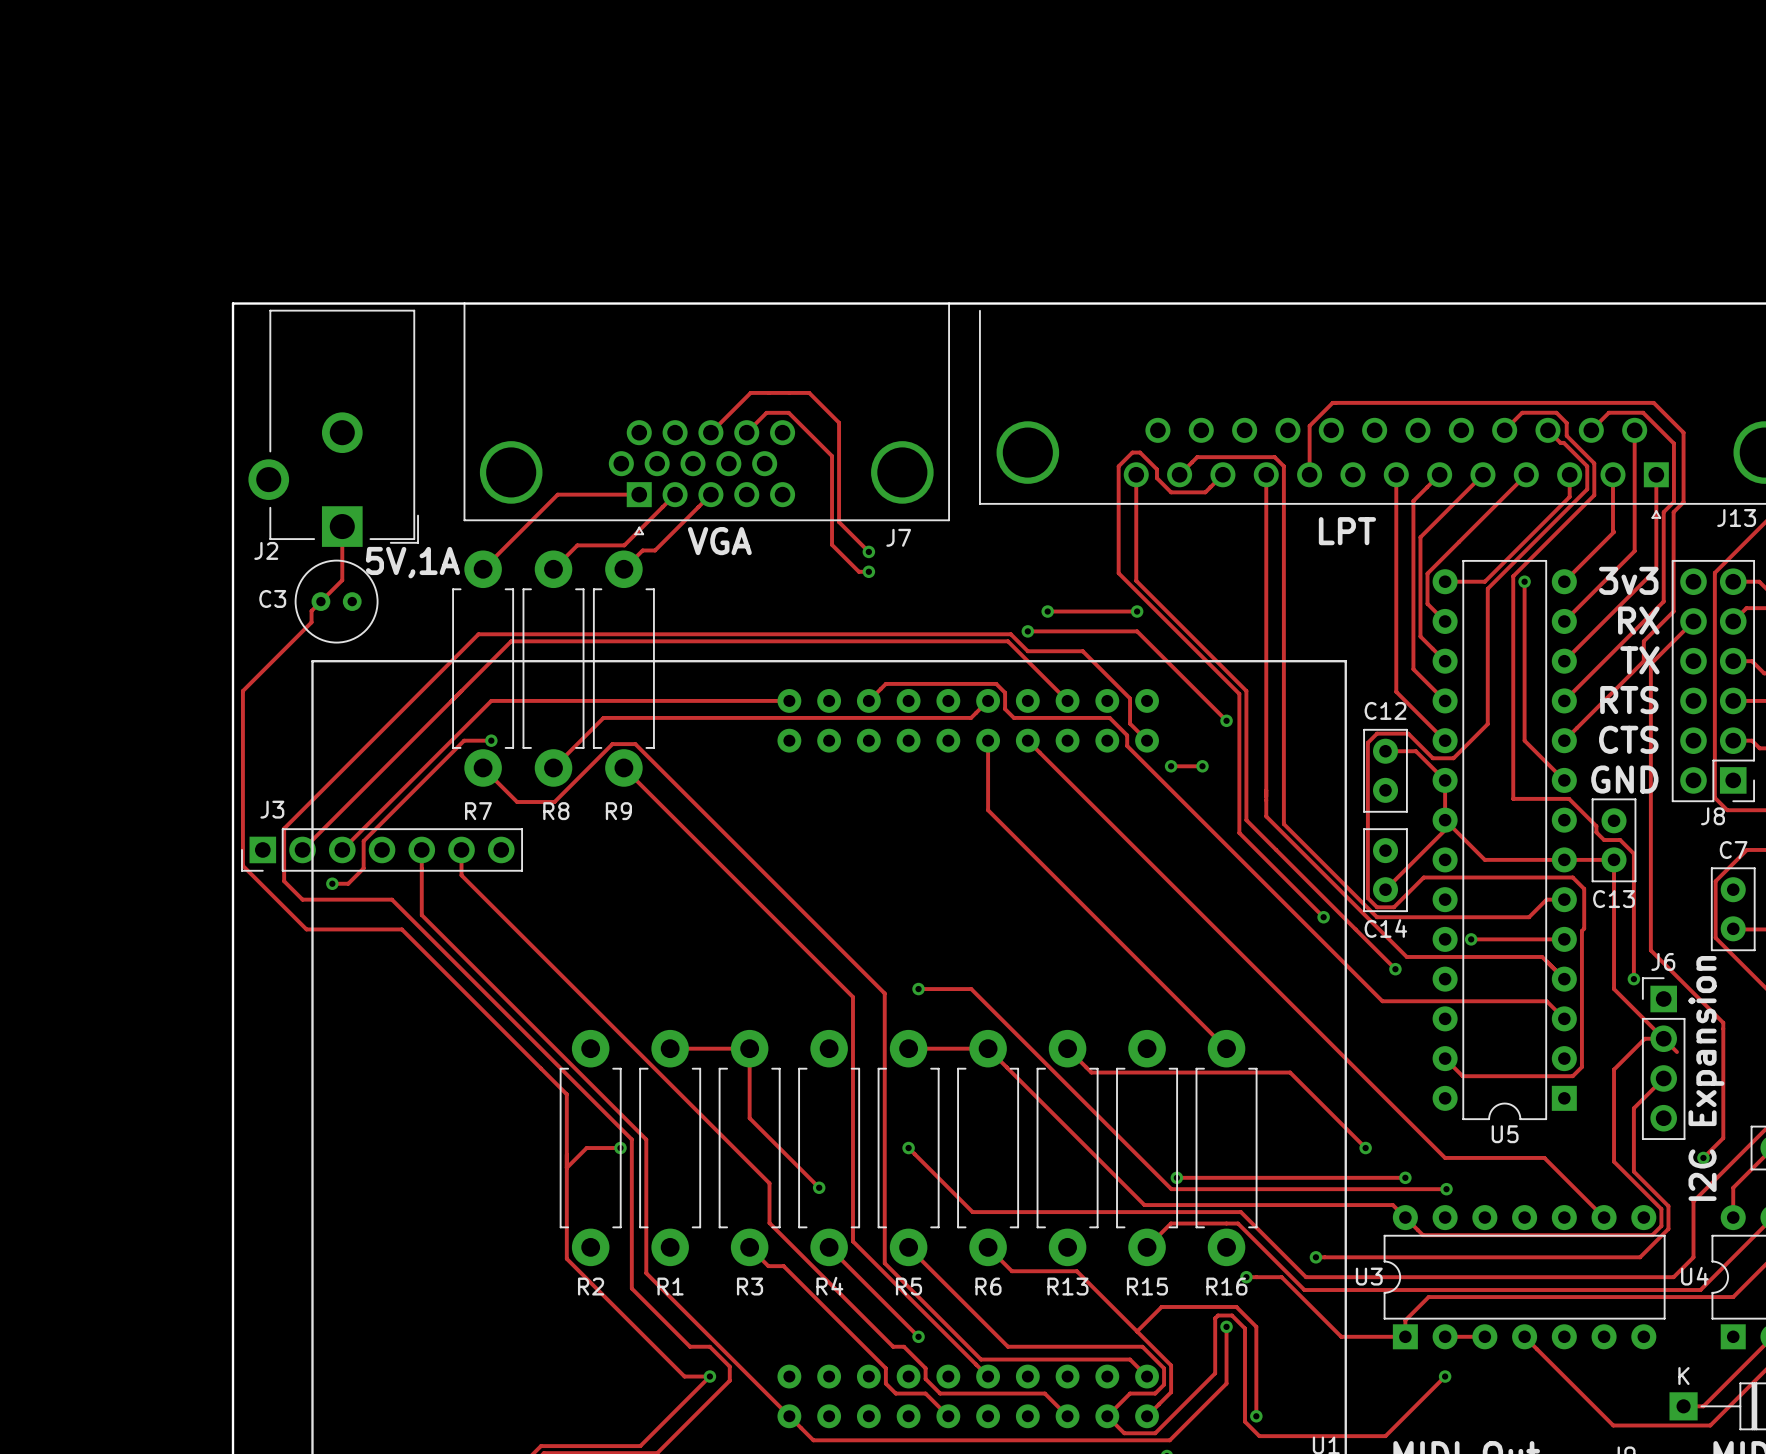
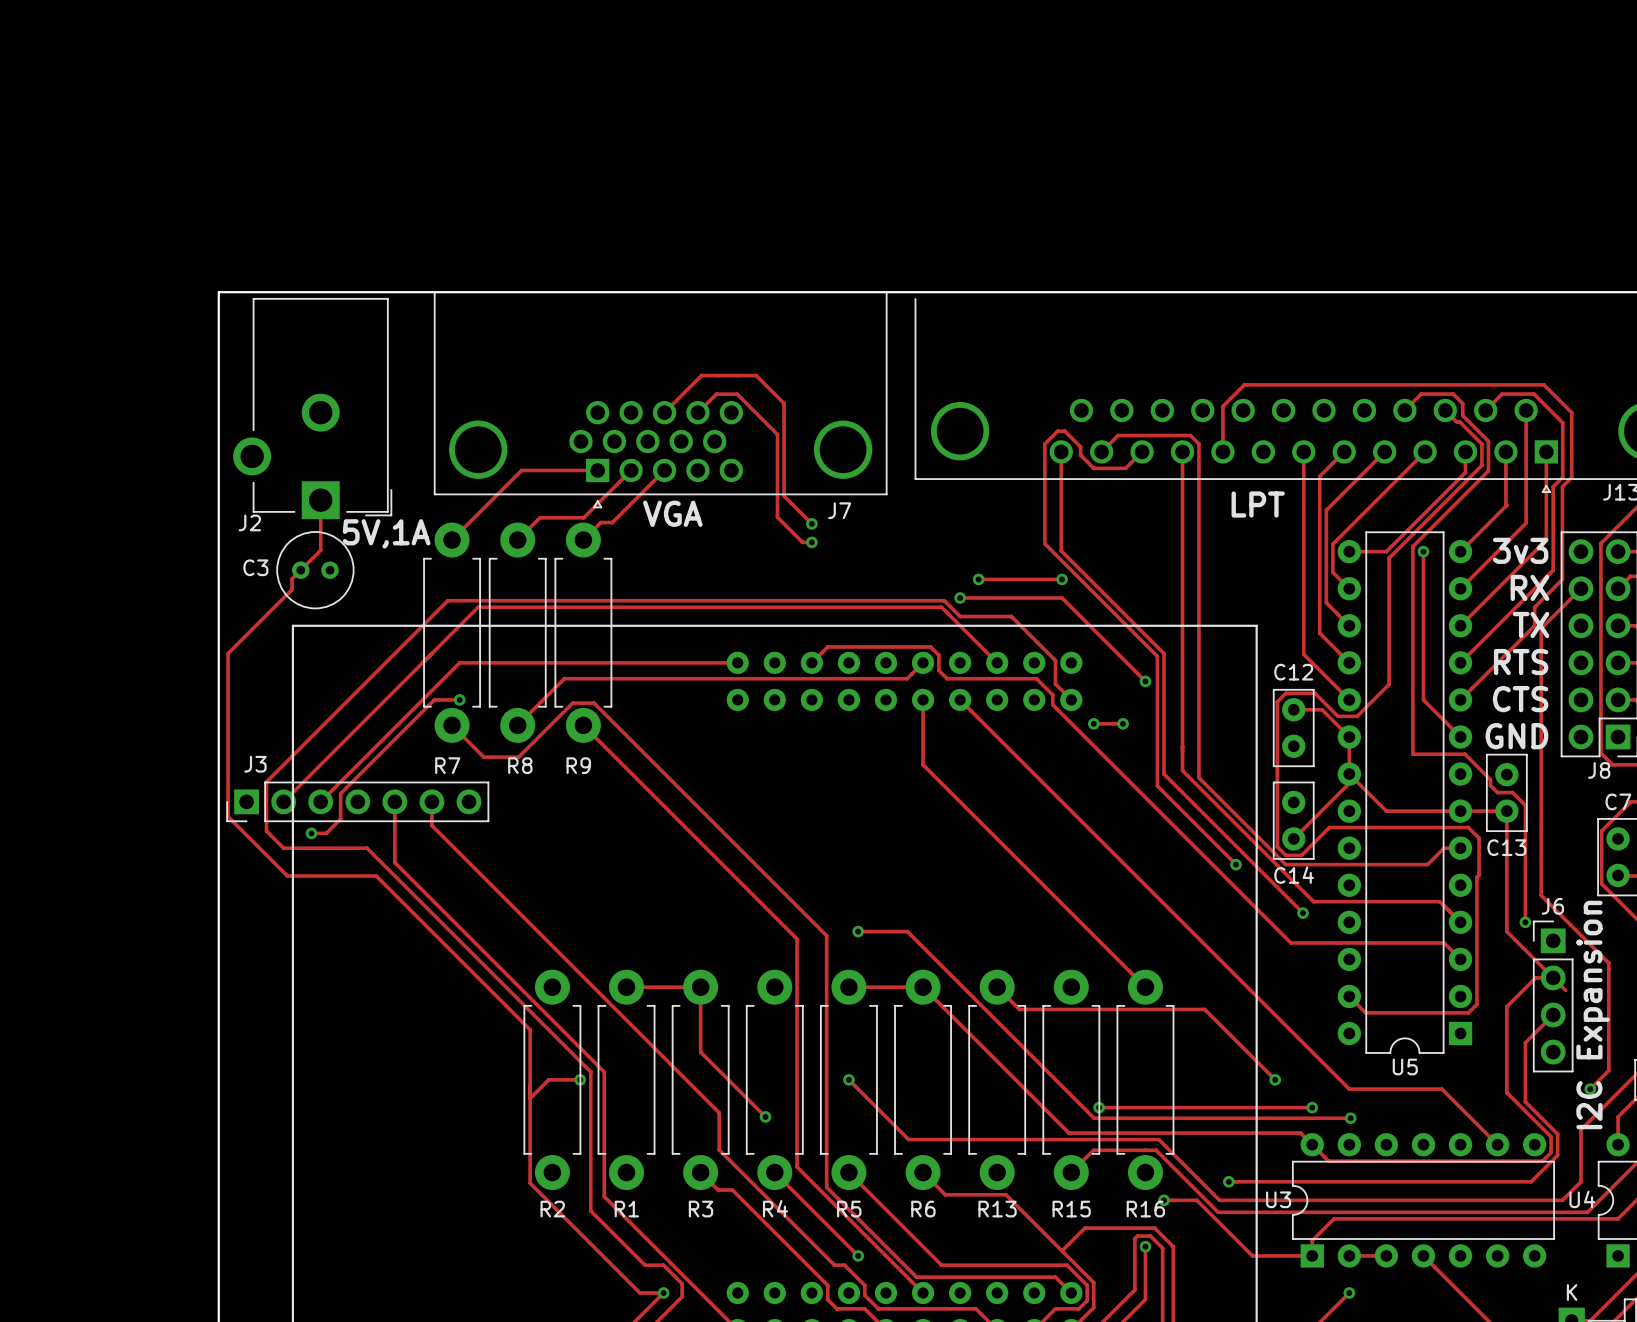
track: (1471, 939) (1564, 939) -> none
via: (1471, 939) -> none

